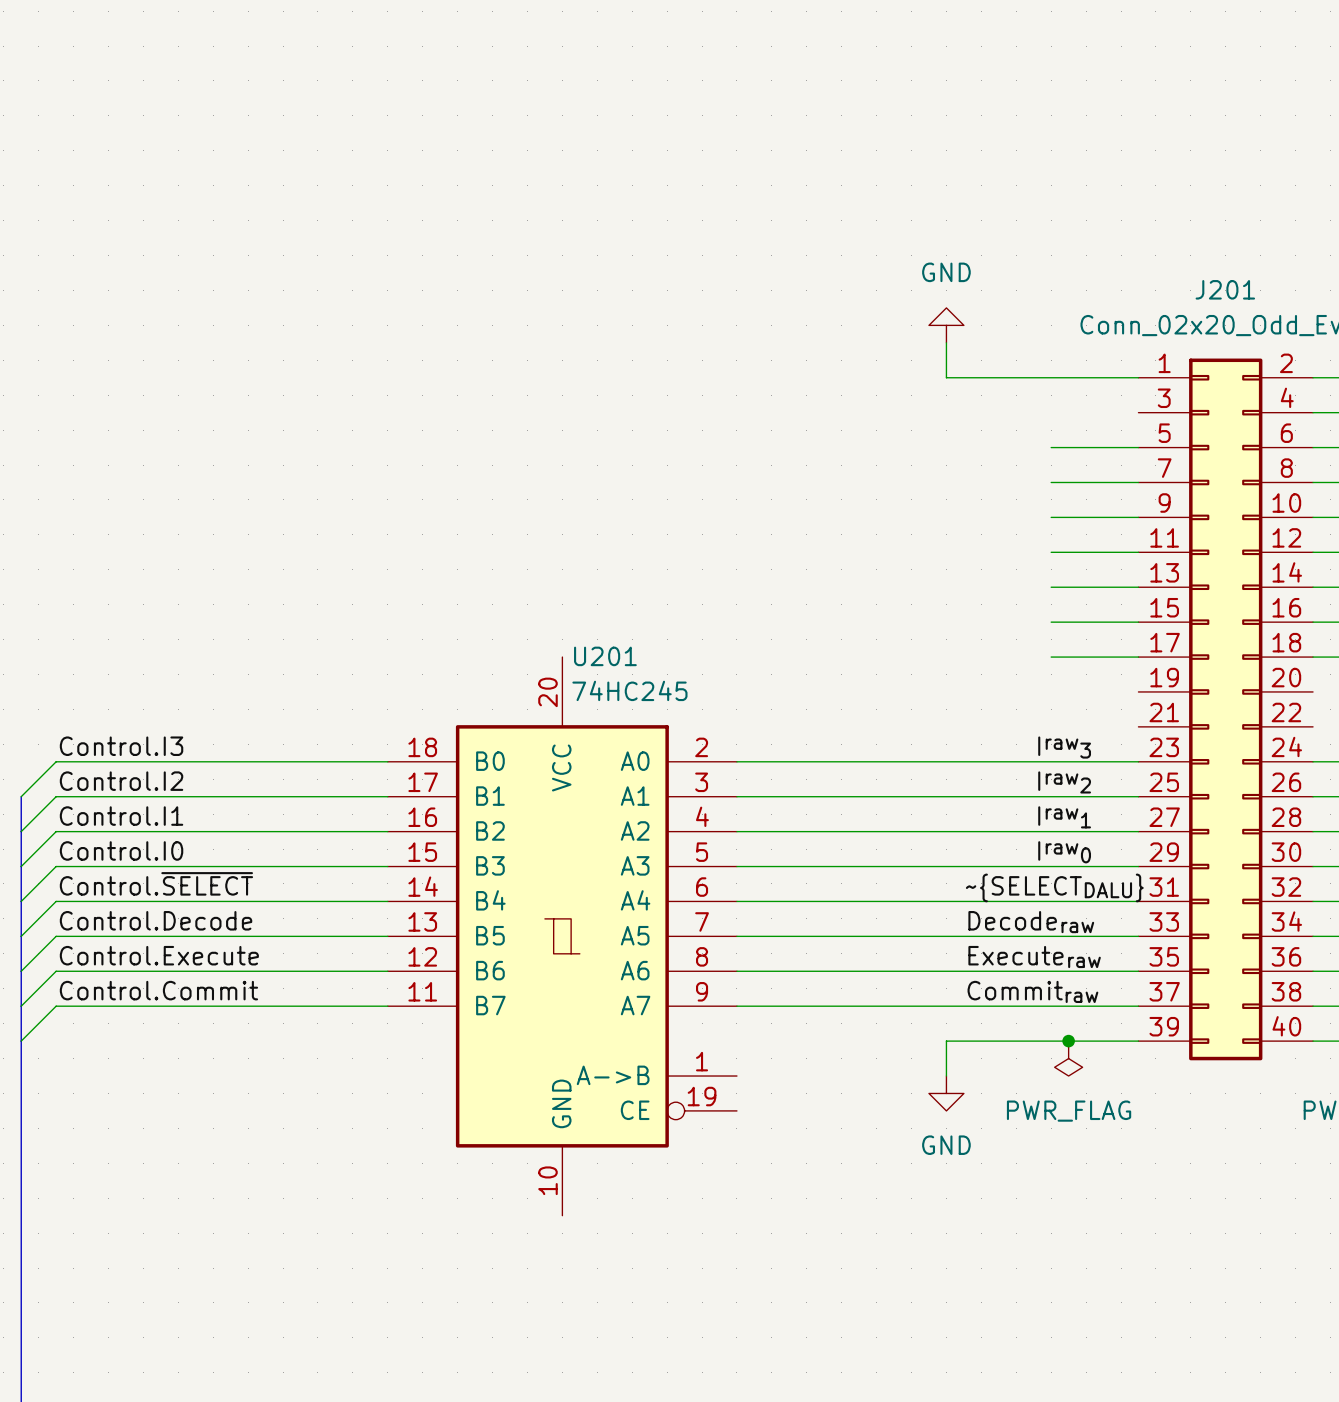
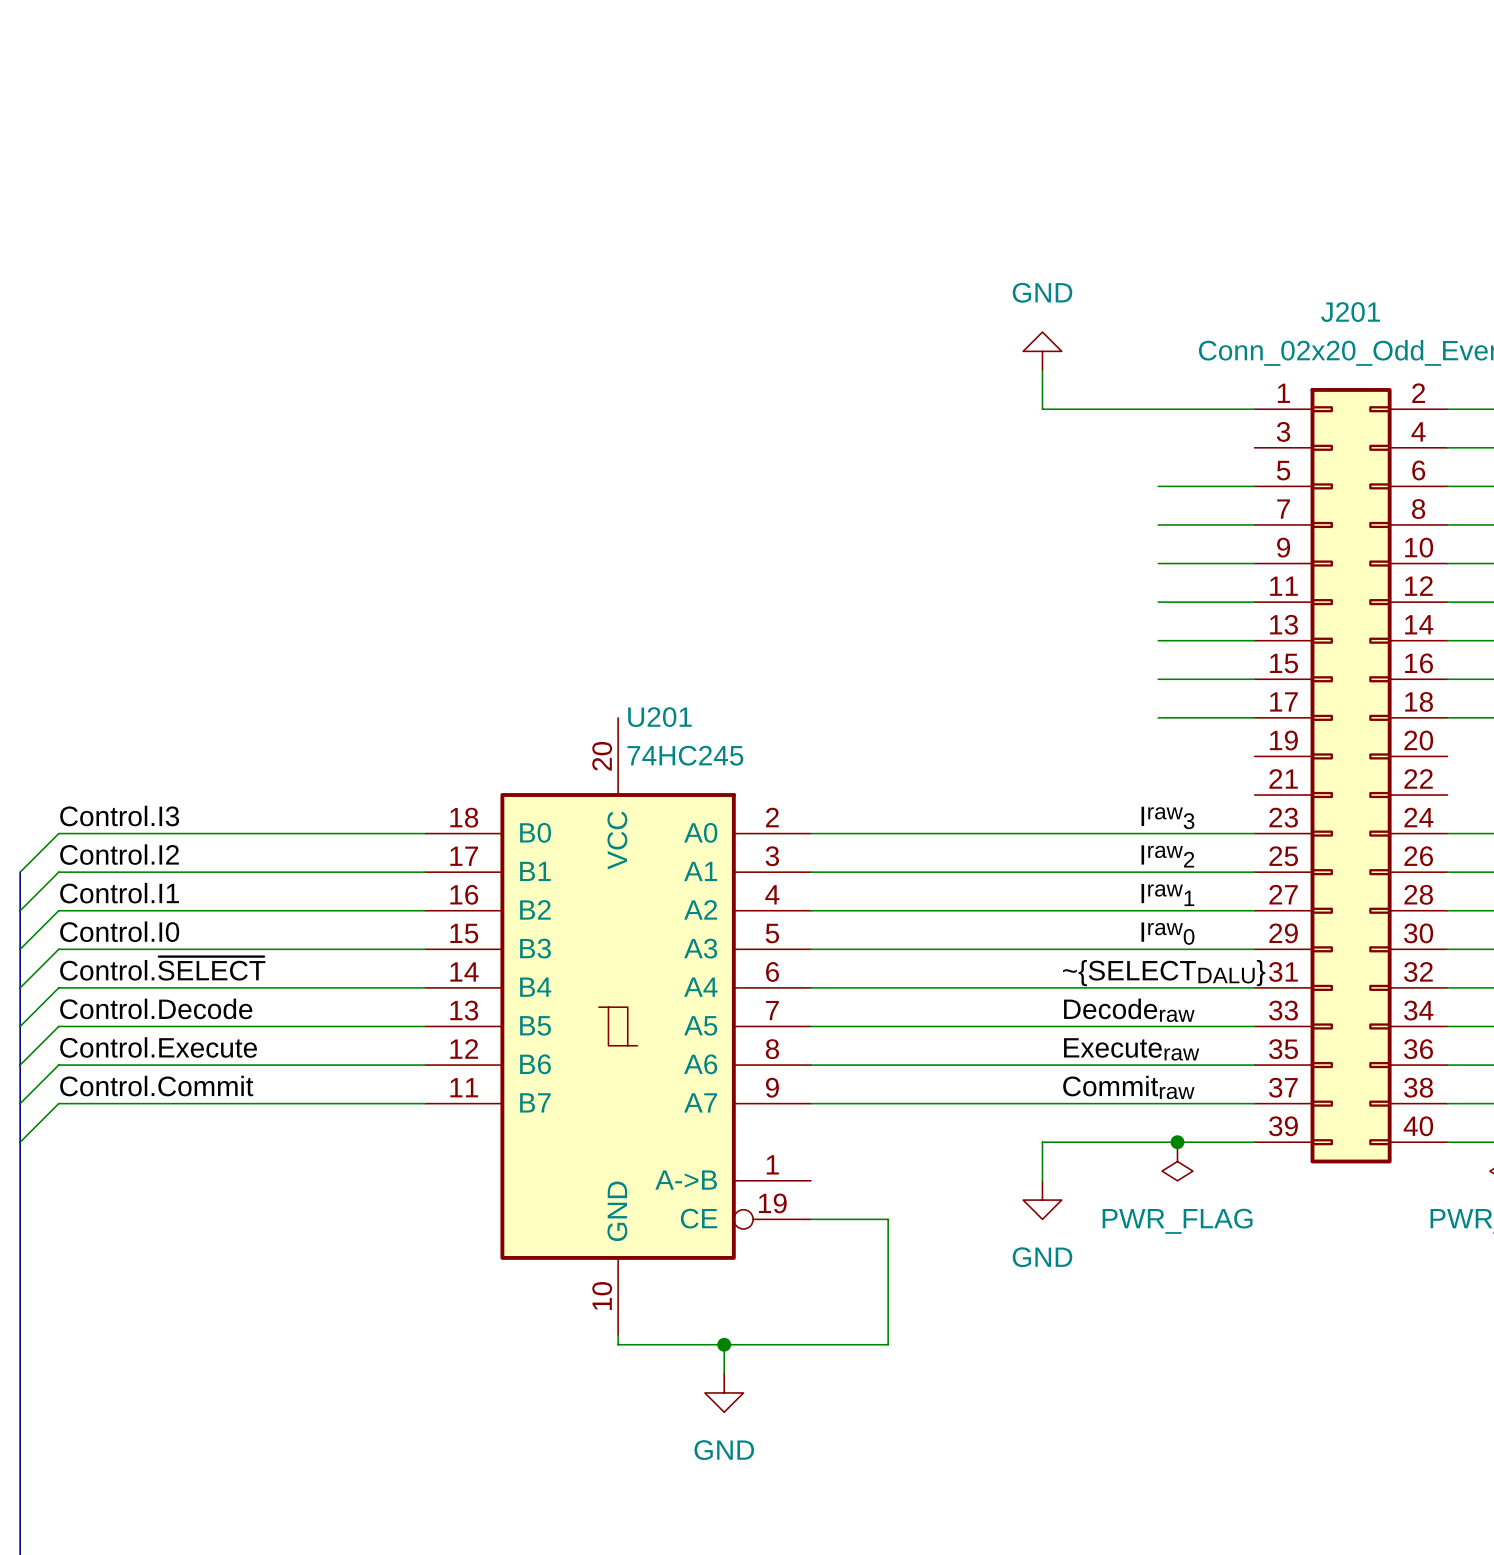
wire: none -> (811, 1219) (888, 1219) (888, 1344) (618, 1344) (618, 1335)
wire: none -> (724, 1344) (724, 1373)
junction: none -> (724, 1344)
power symbol: none -> GND (724, 1392)

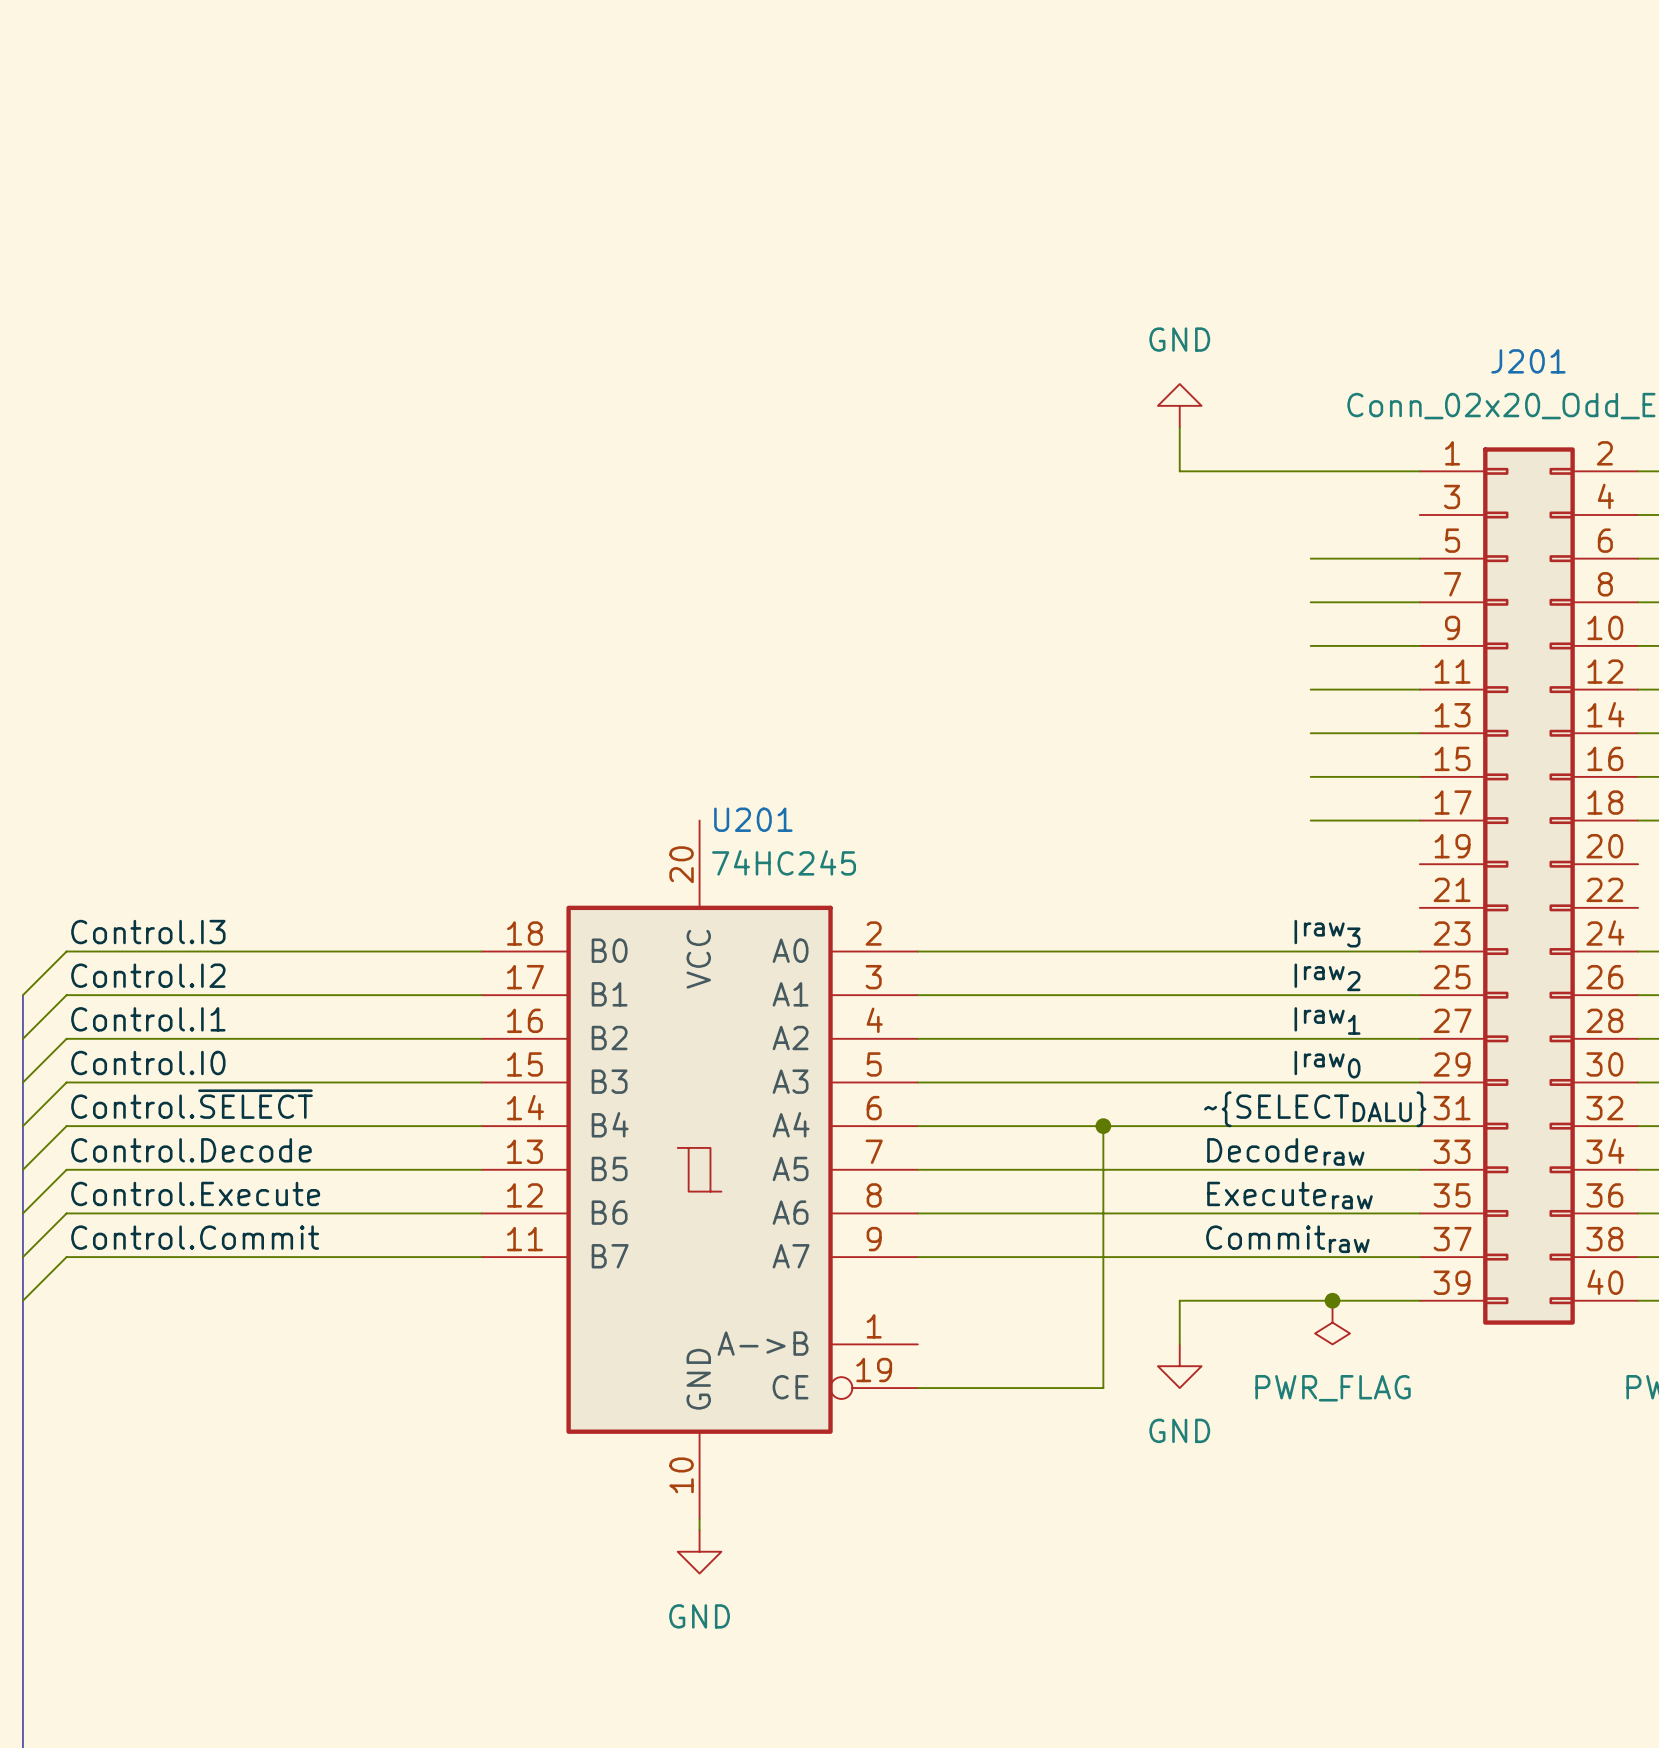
junction: none -> (1103, 1126)
wire: (888, 1219) (888, 1344) (618, 1344) -> (1005, 1388) (1103, 1388) (1103, 1126)
wire: (724, 1344) (724, 1373) -> none
junction: (724, 1344) -> none
power symbol position: GND (724, 1392) -> GND (699, 1551)

